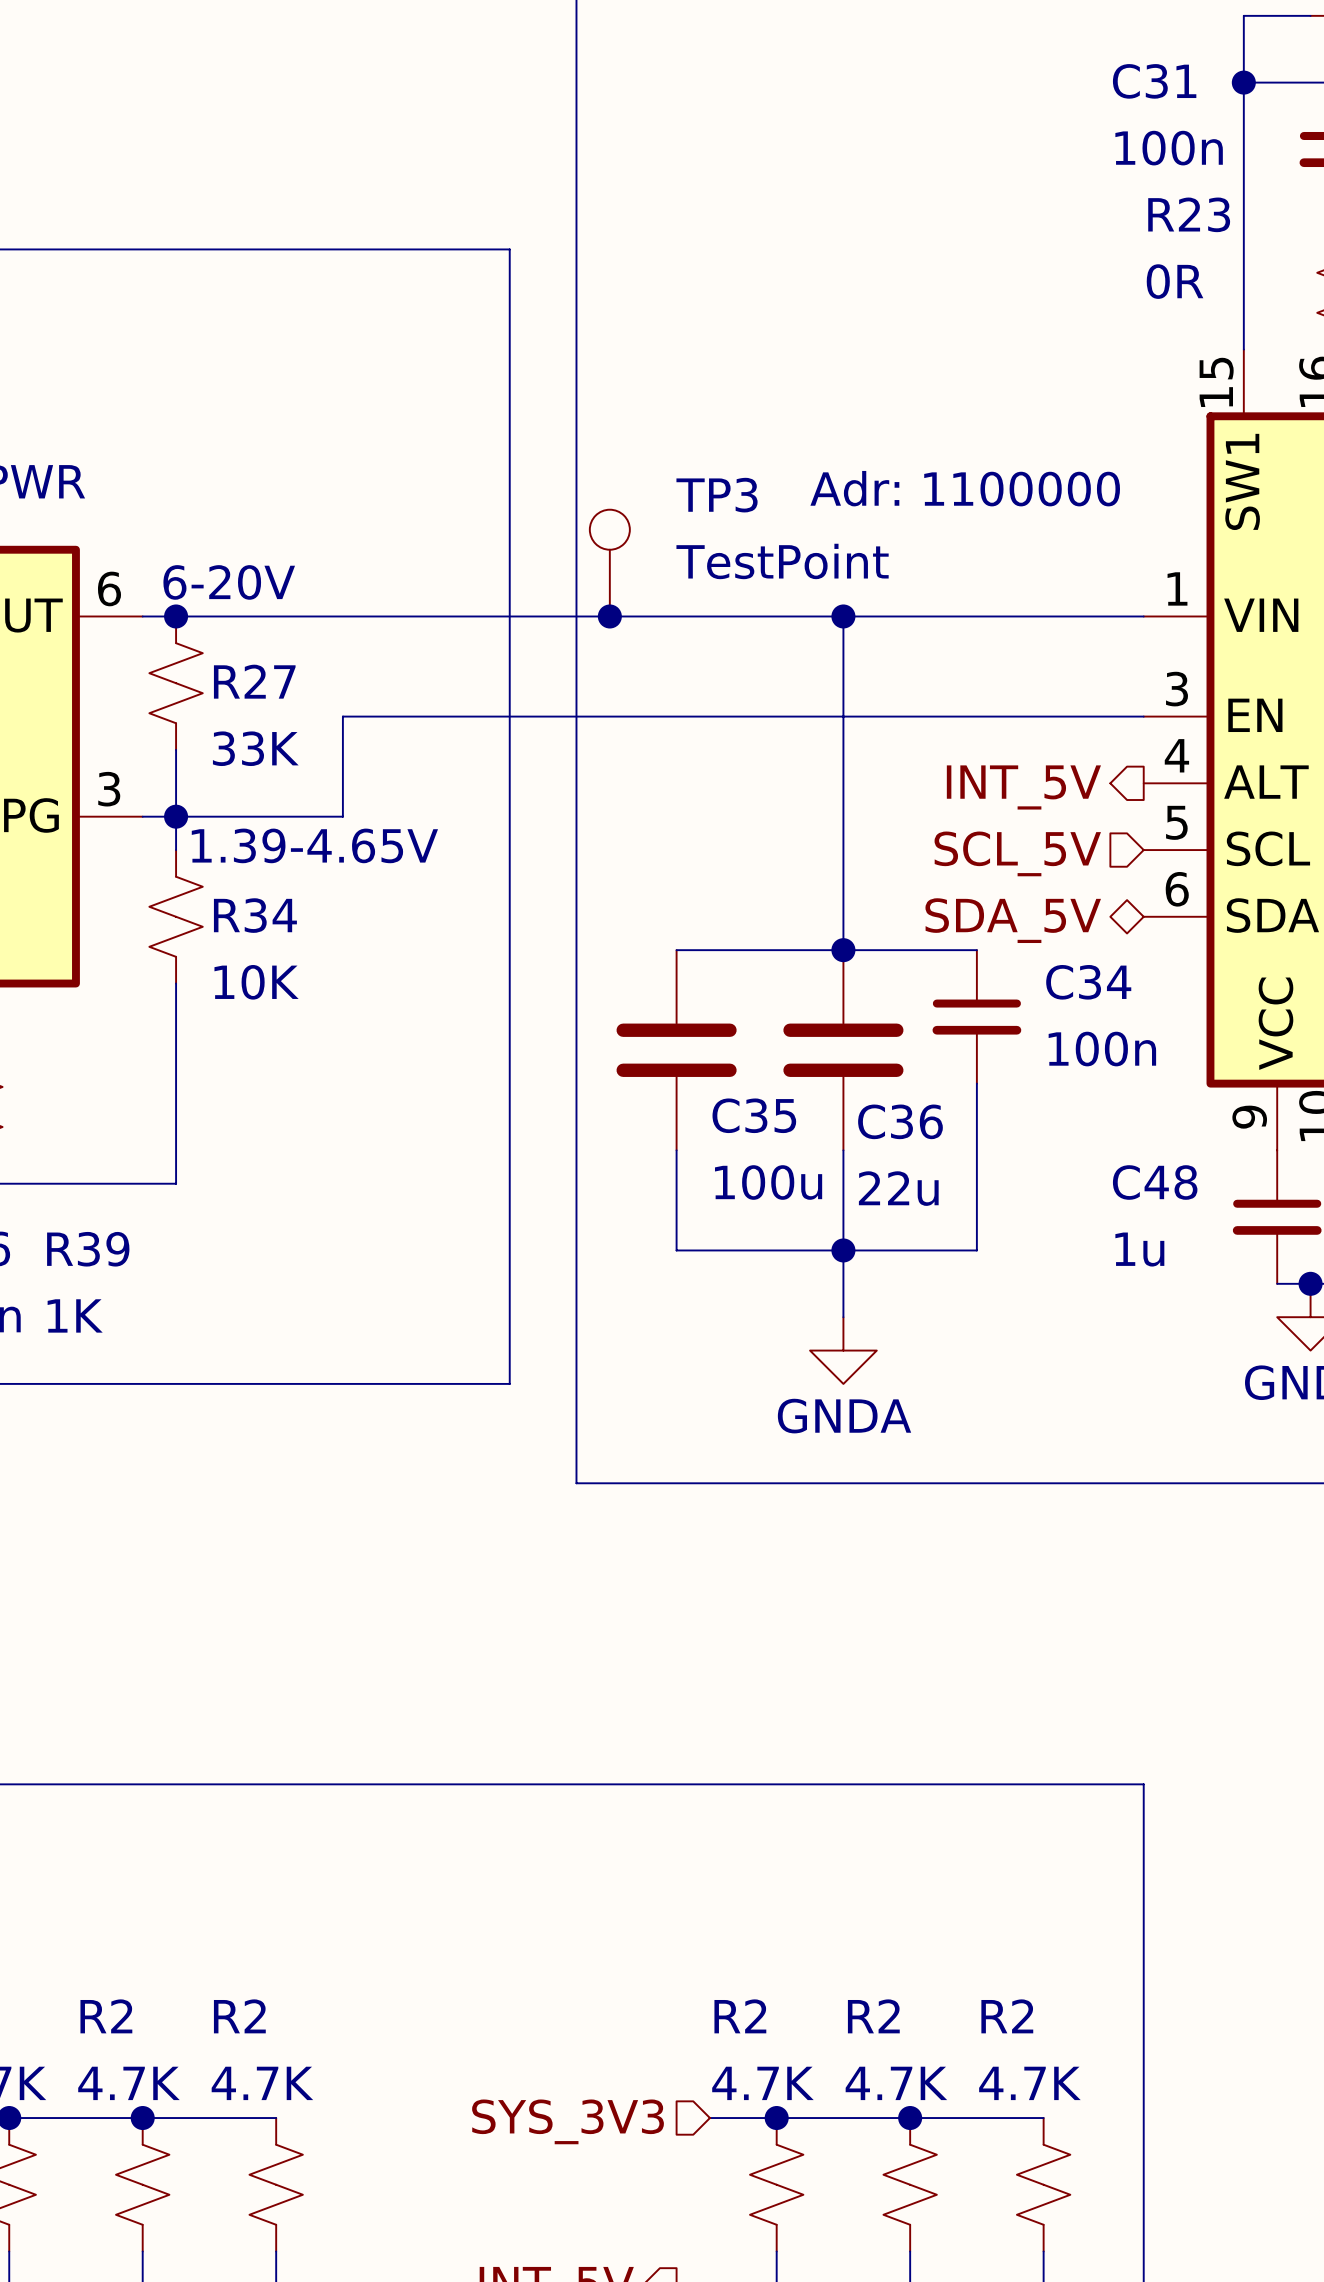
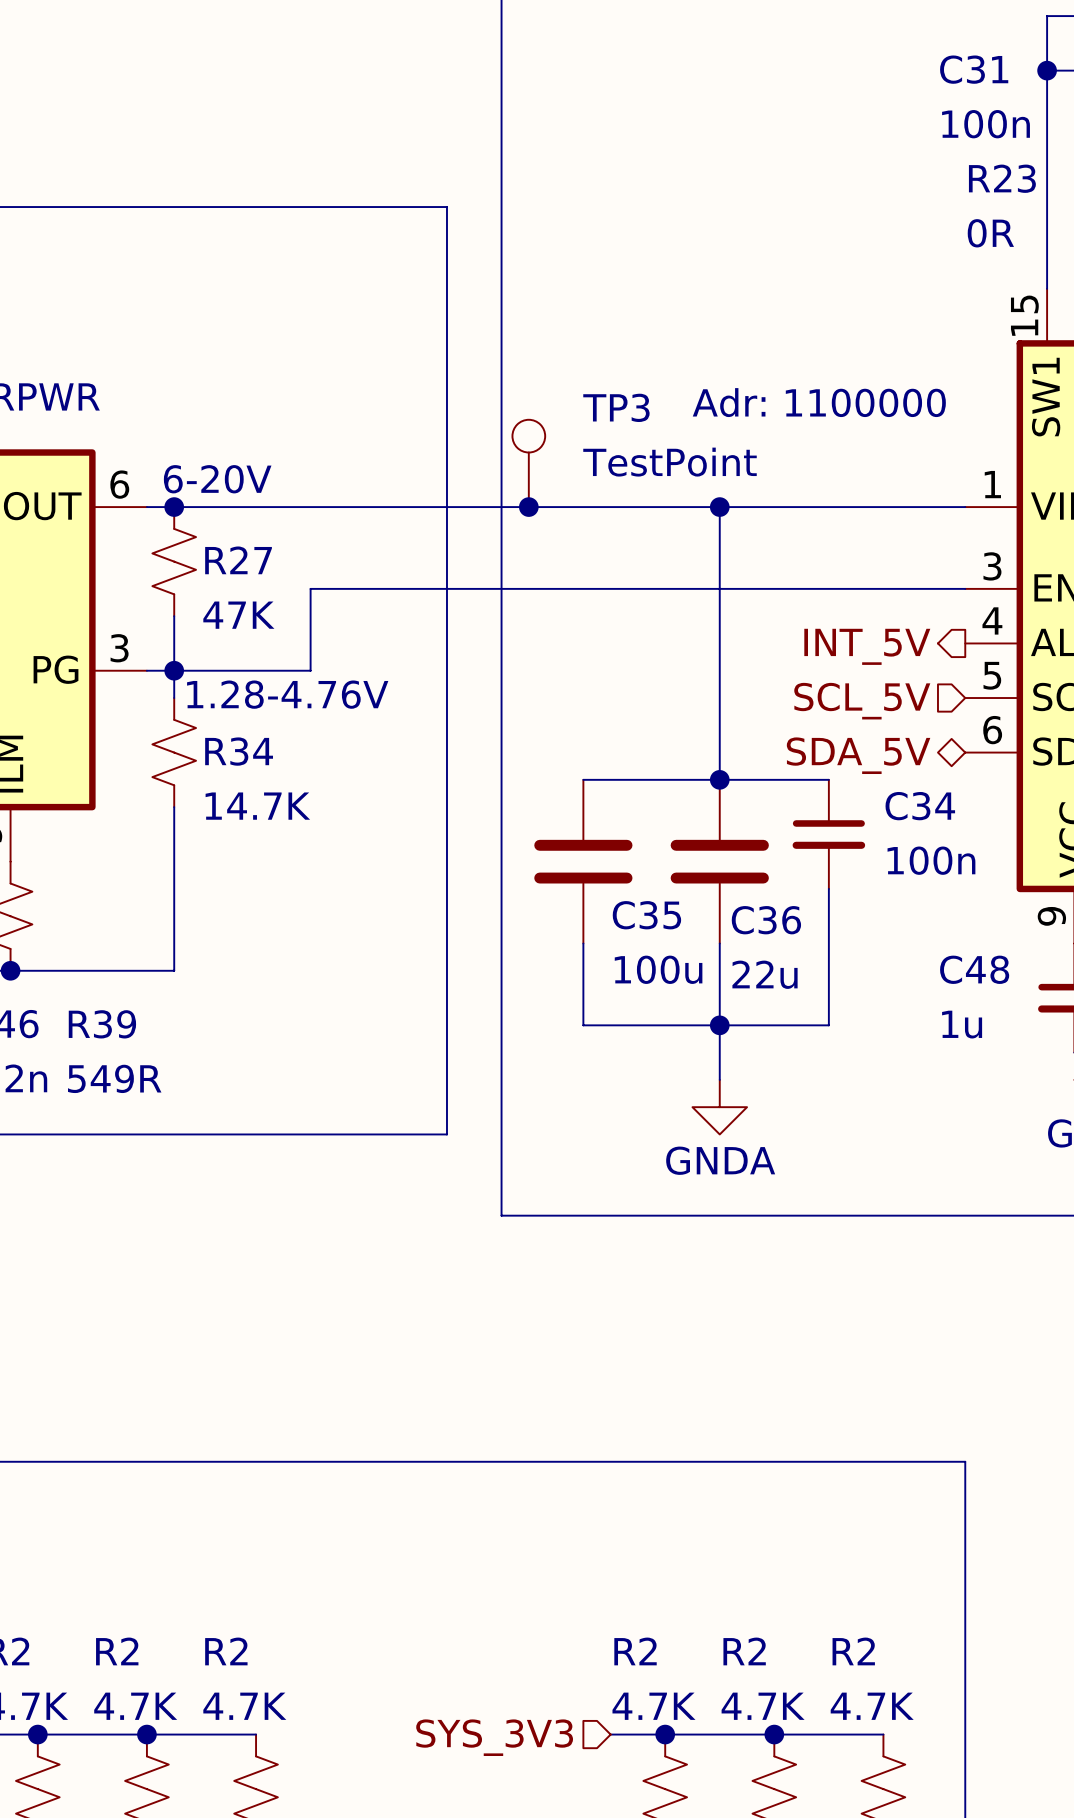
R27 value: 33K (255, 748) -> 47K (238, 615)
text: 1.39-4.65V (314, 845) -> 1.28-4.76V (287, 694)
R34 value: 10K (256, 982) -> 14.7K (257, 806)
R39 value: 1K (75, 1315) -> 549R (114, 1078)

